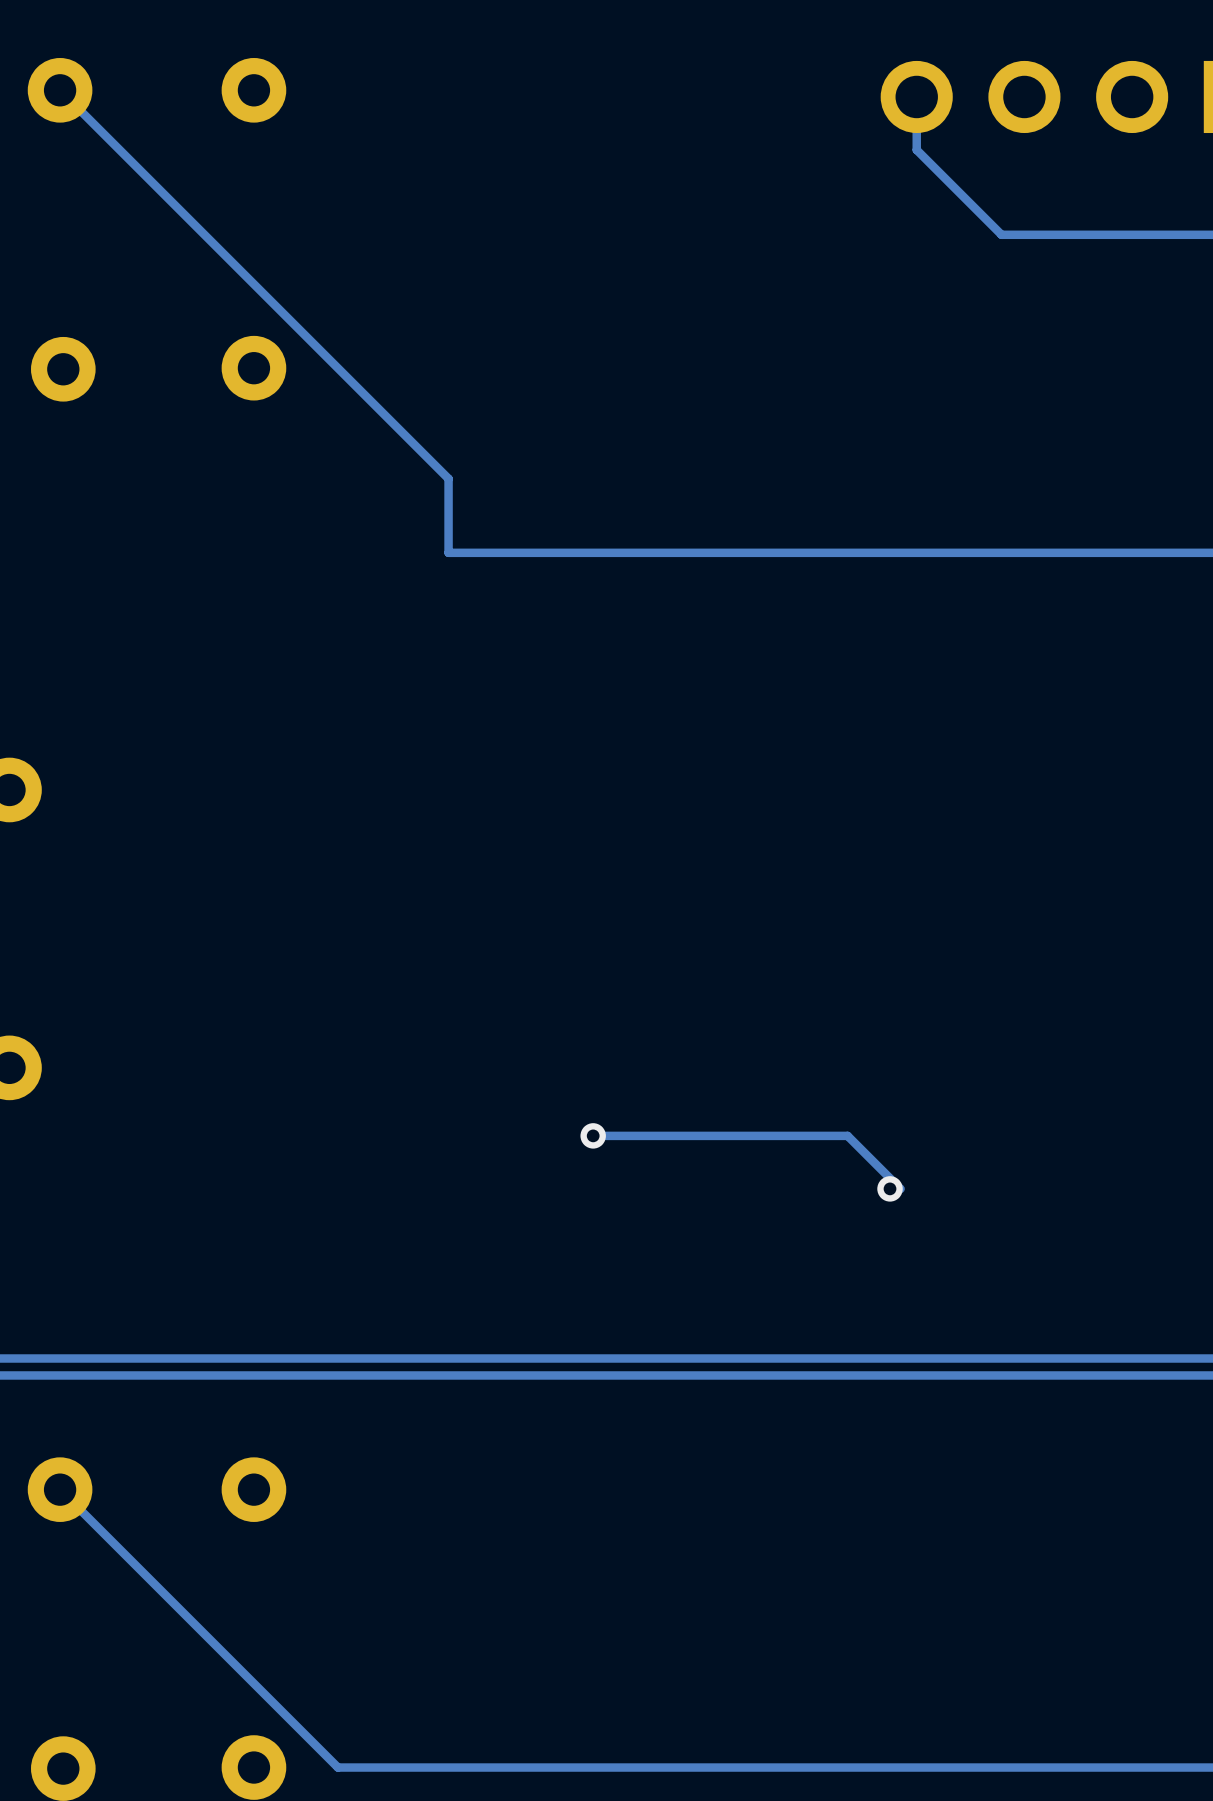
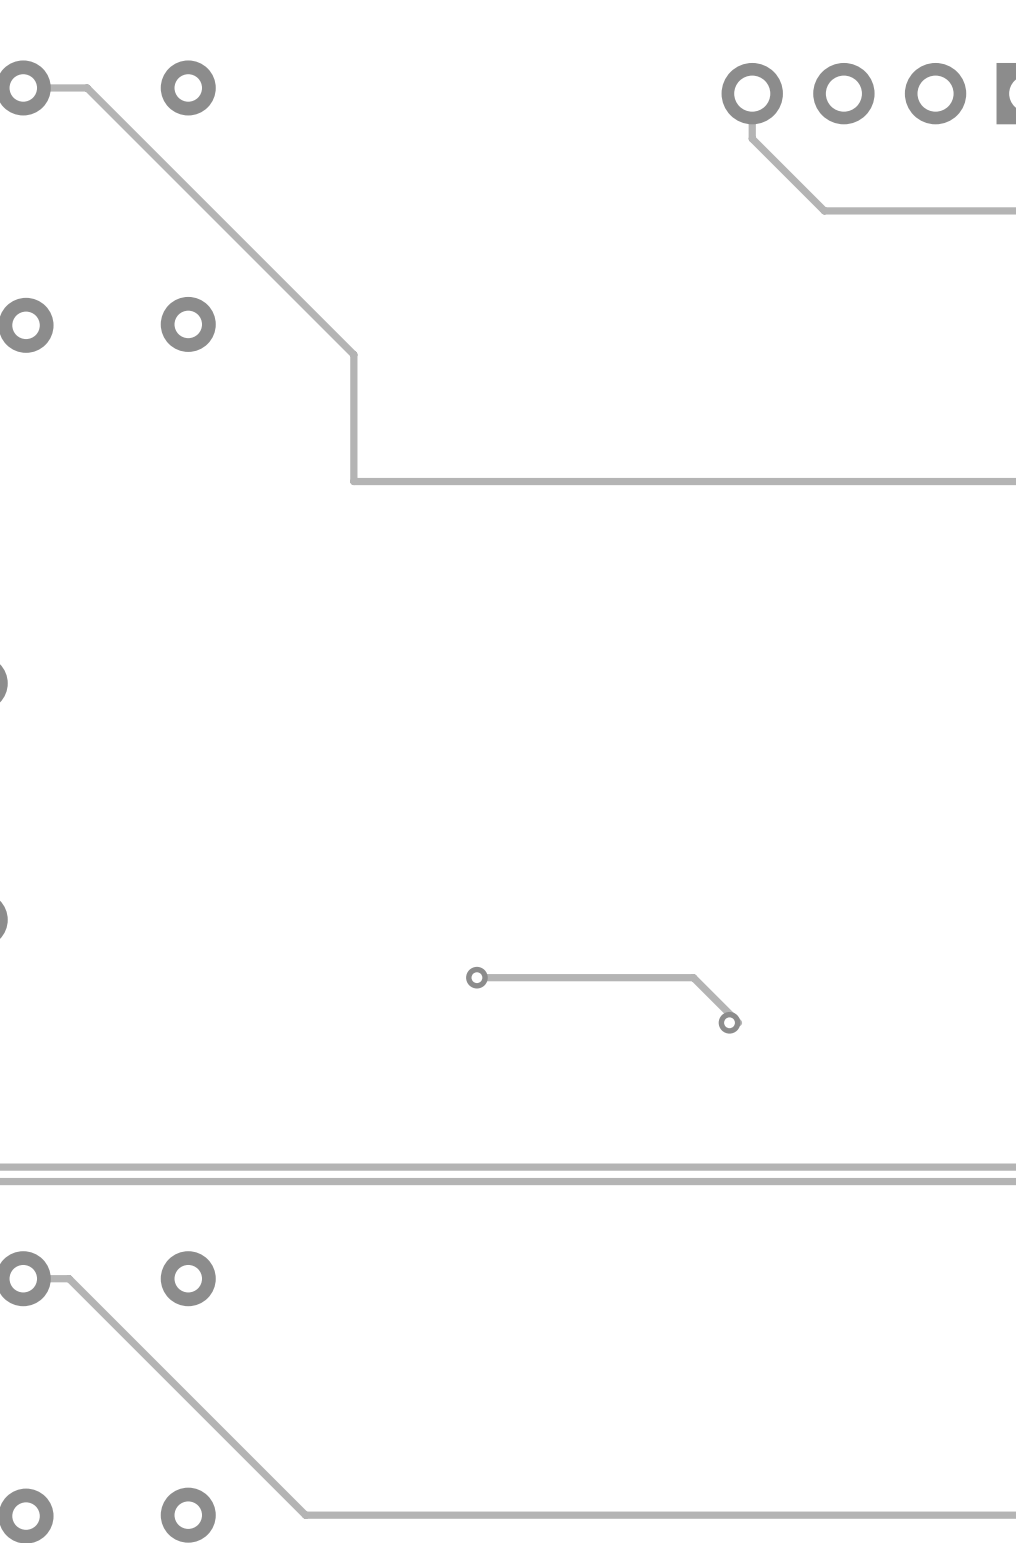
track: (60, 90) (448, 478) -> (23, 87) (87, 87) (353, 354) (353, 418)
track: (60, 1489) (337, 1767) (391, 1767) -> (23, 1278) (69, 1278) (305, 1515)

